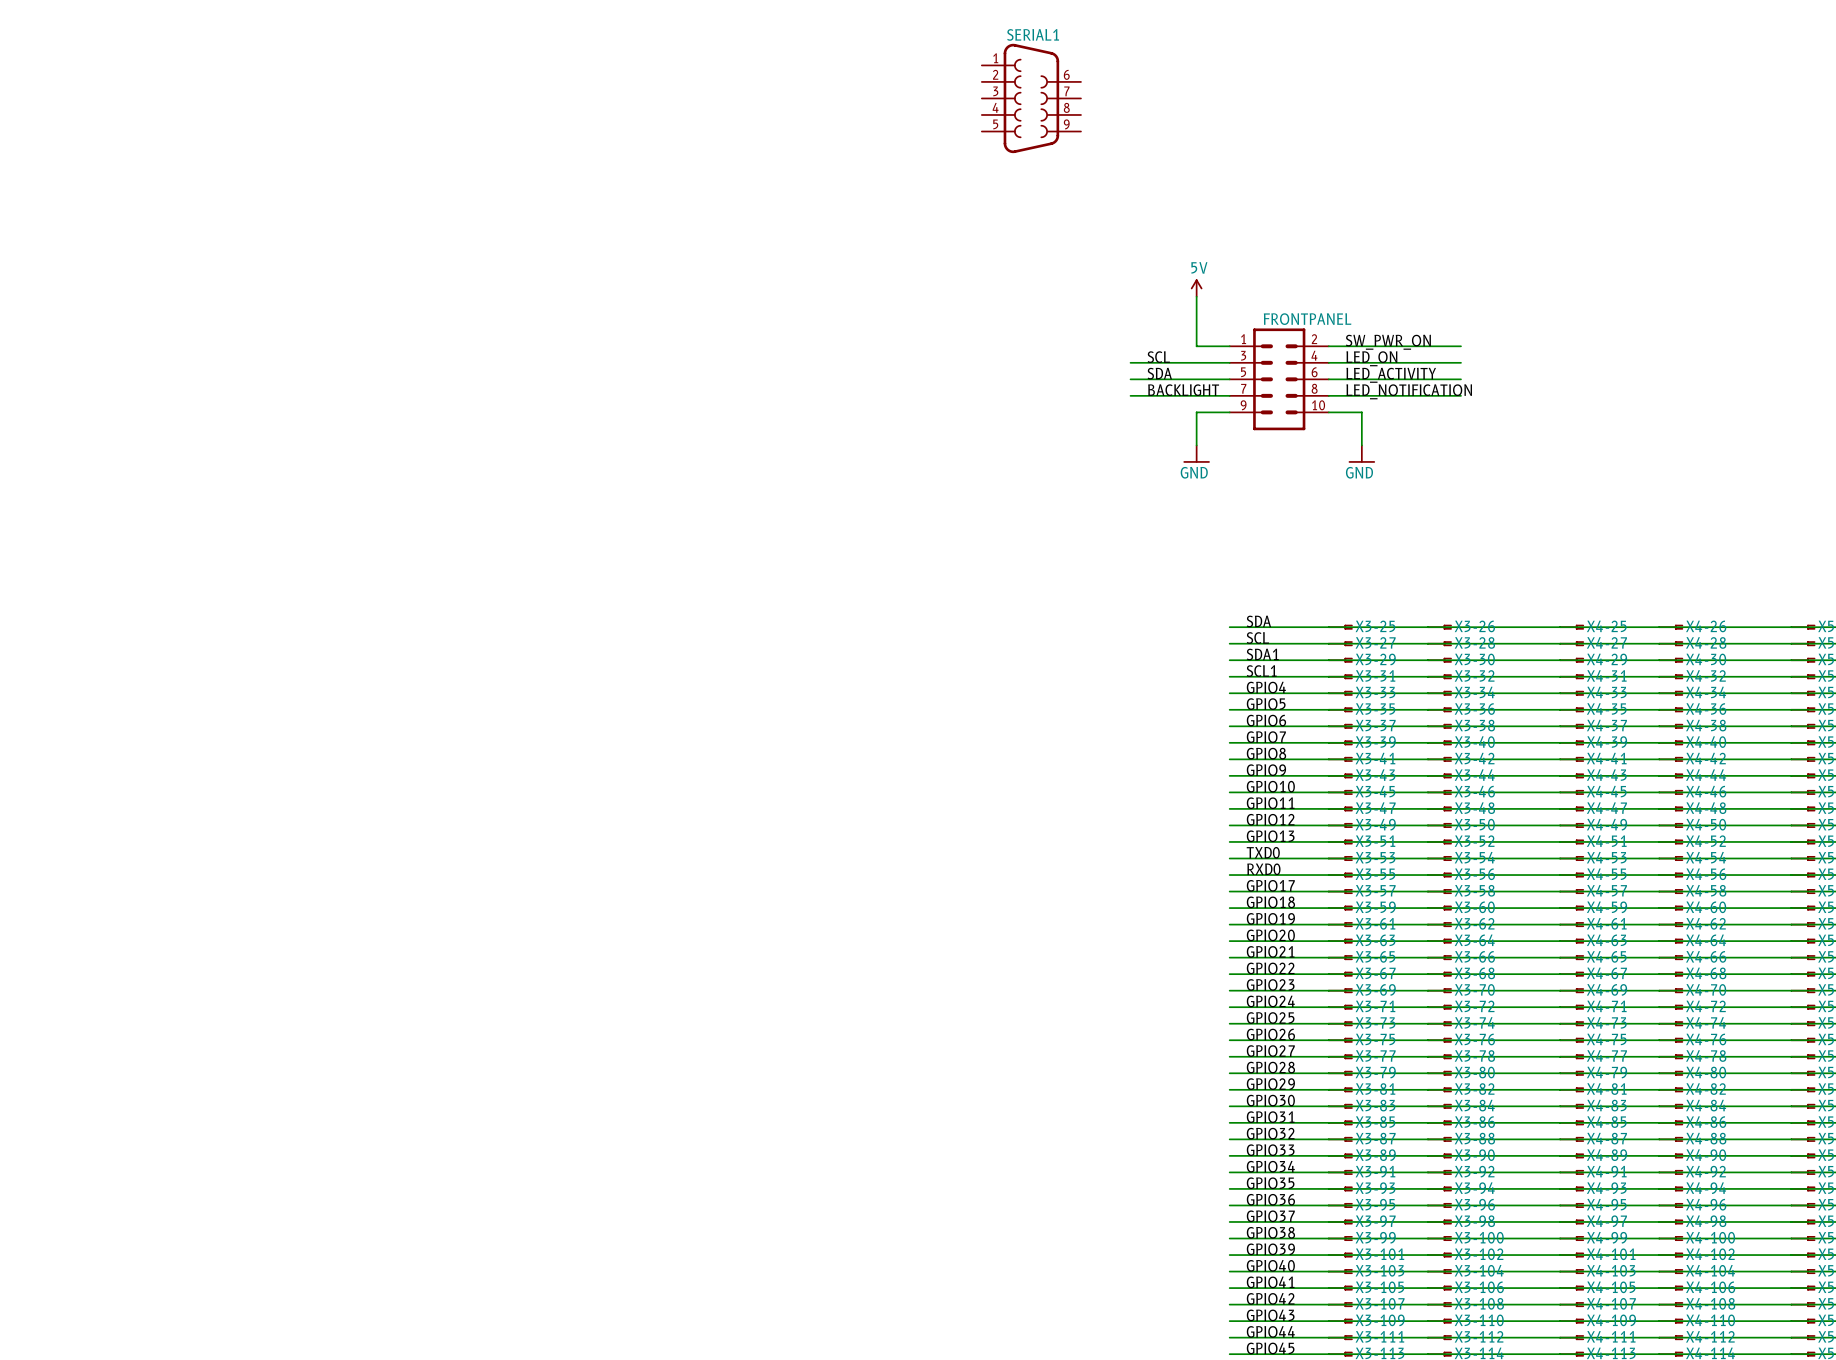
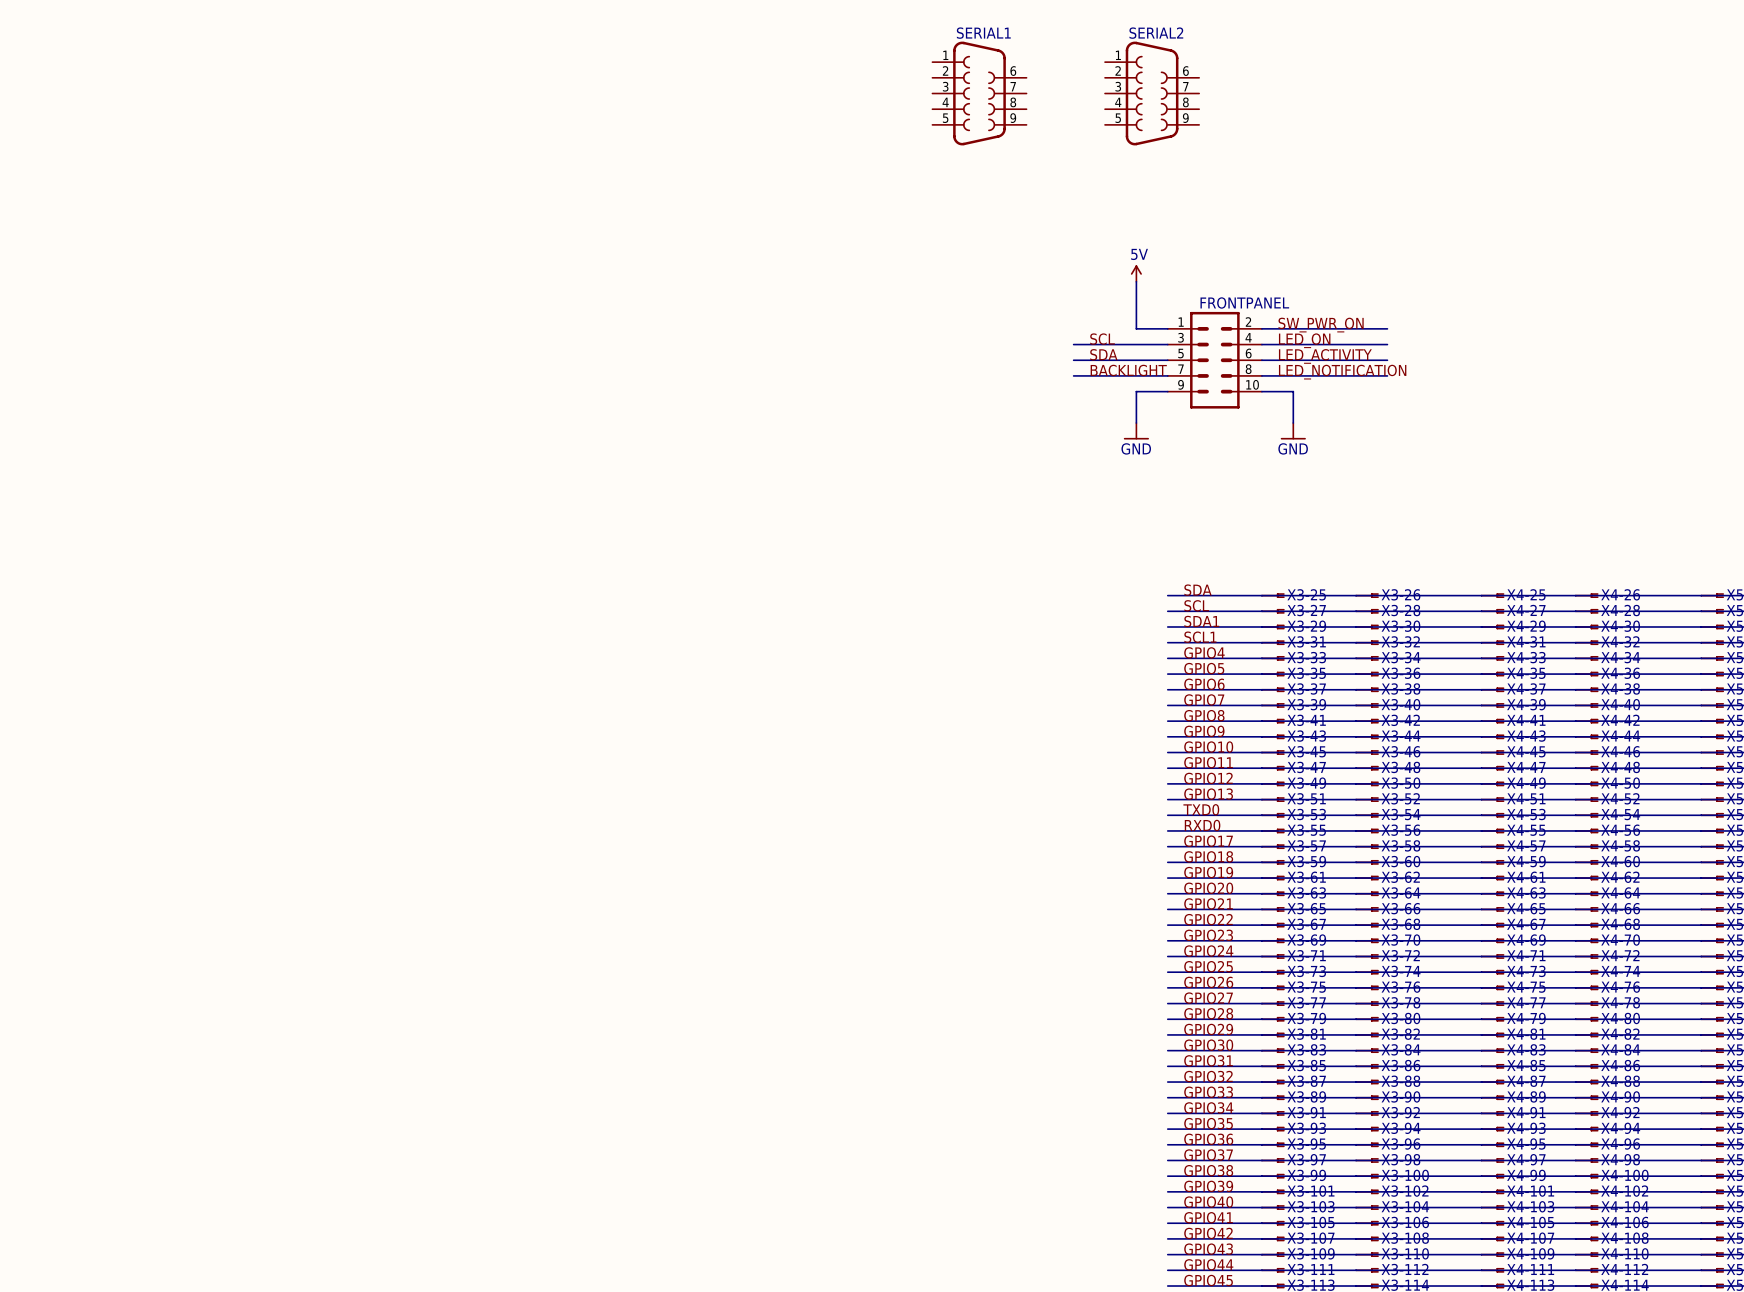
SERIAL2: none -> (1152, 93)

